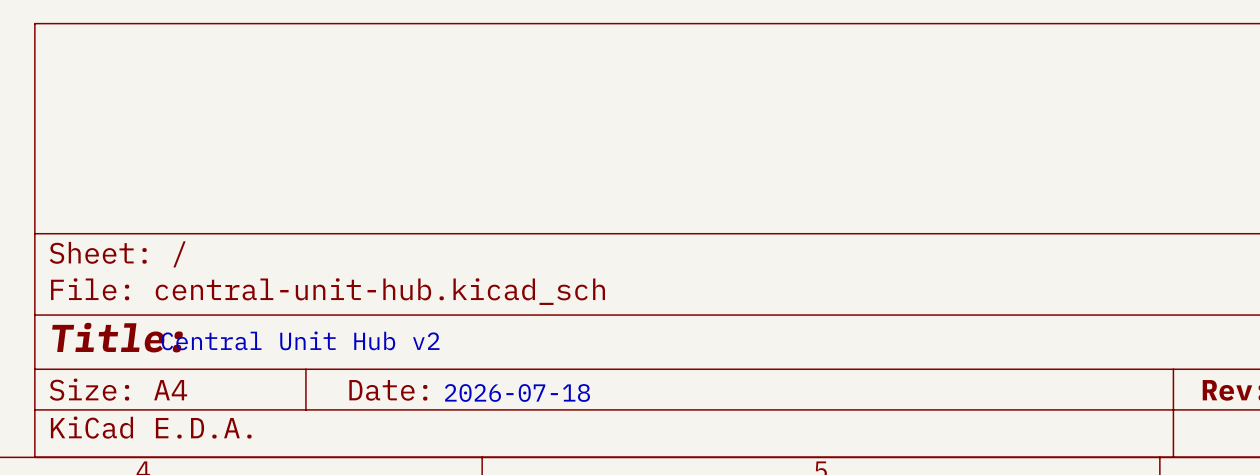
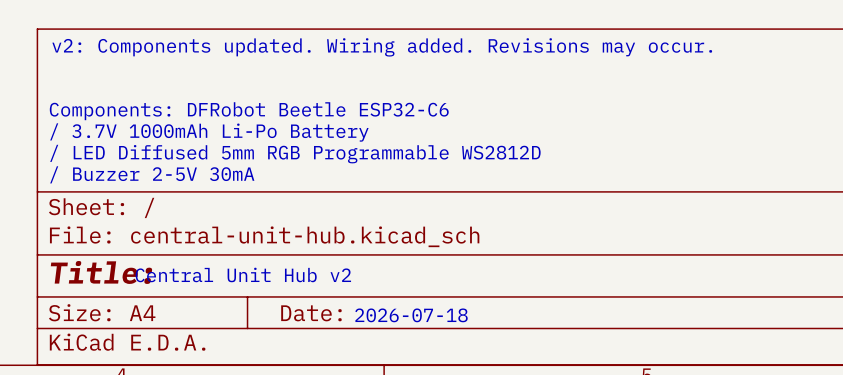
text: none -> v2: Components updated. Wiring added. Revisions may occur. (382, 47)
text: none -> Components: DFRobot Beetle ESP32-C6 (249, 111)
text: none -> / 3.7V 1000mAh Li-Po Battery (209, 132)
text: none -> / LED Diffused 5mm RGB Programmable WS2812D (295, 154)
text: none -> / Buzzer 2-5V 30mA (152, 174)

